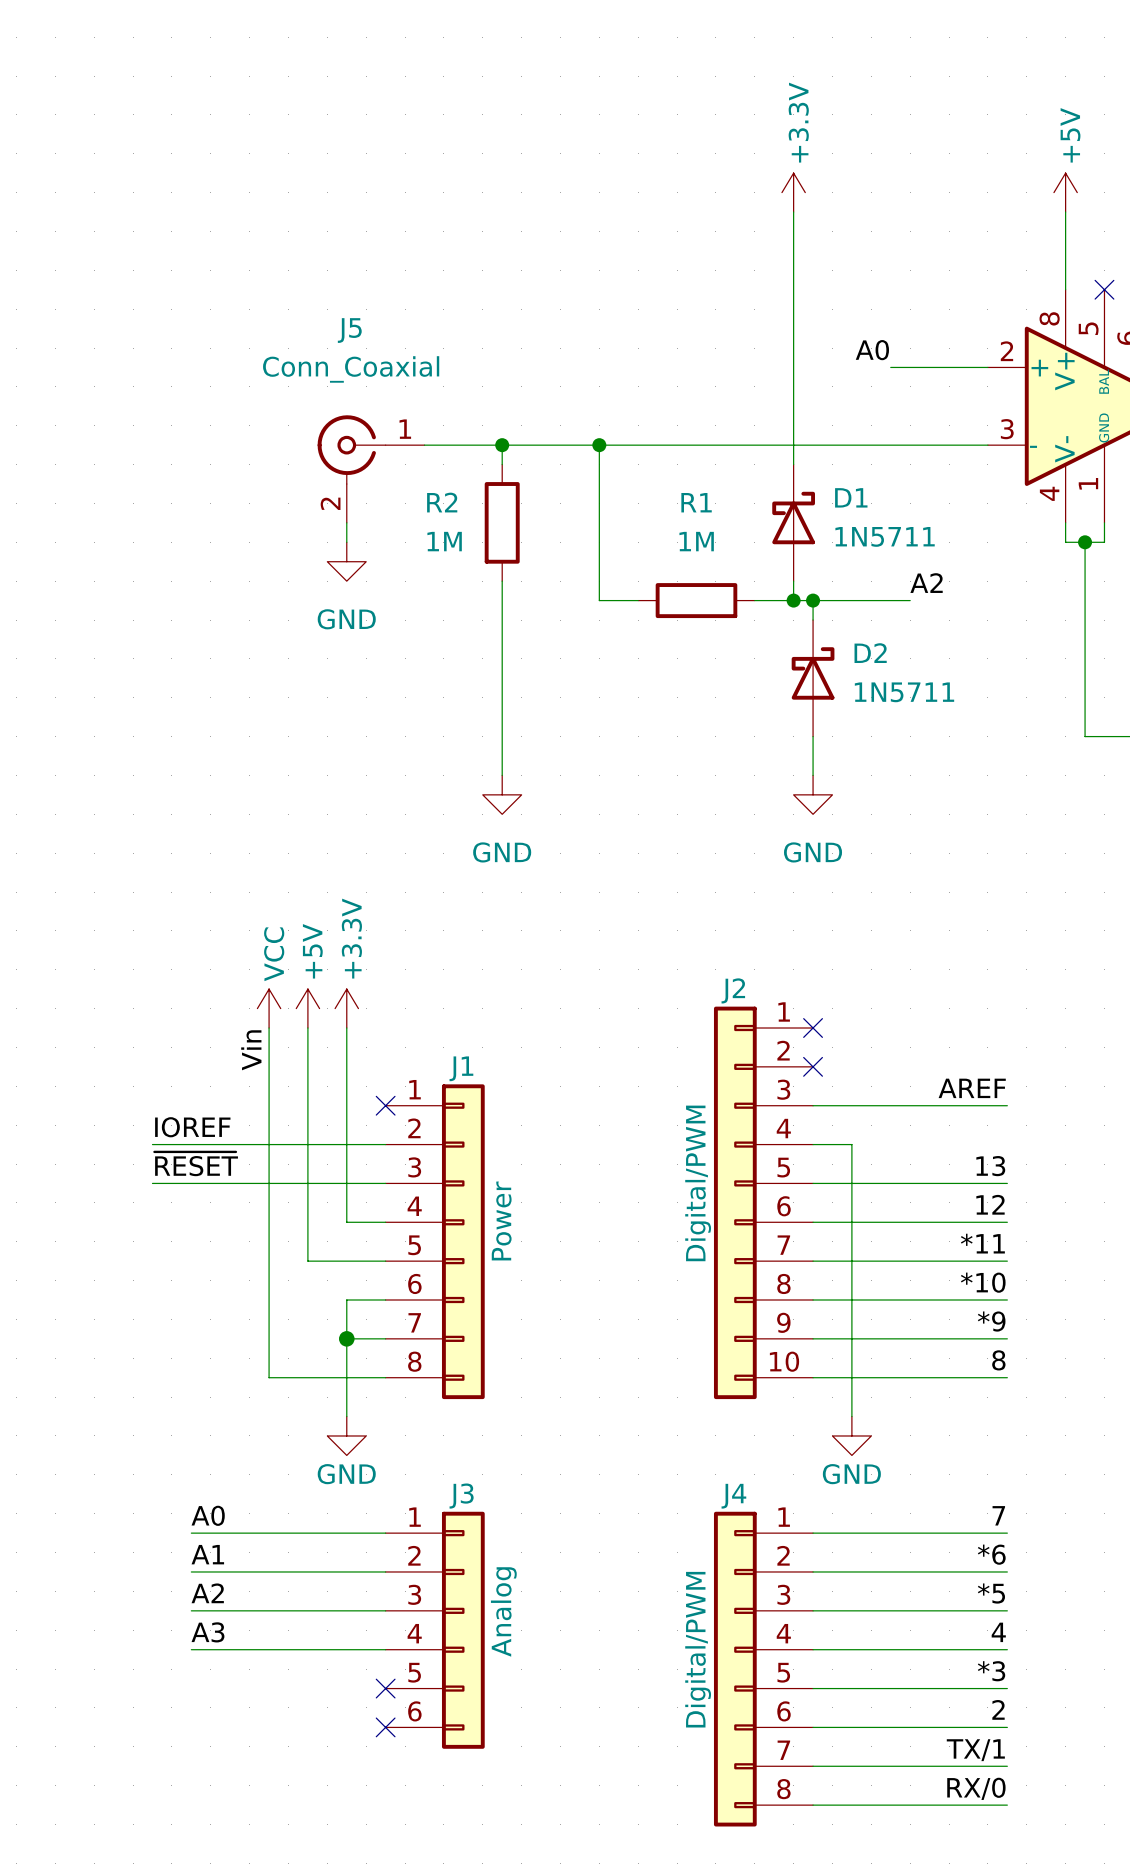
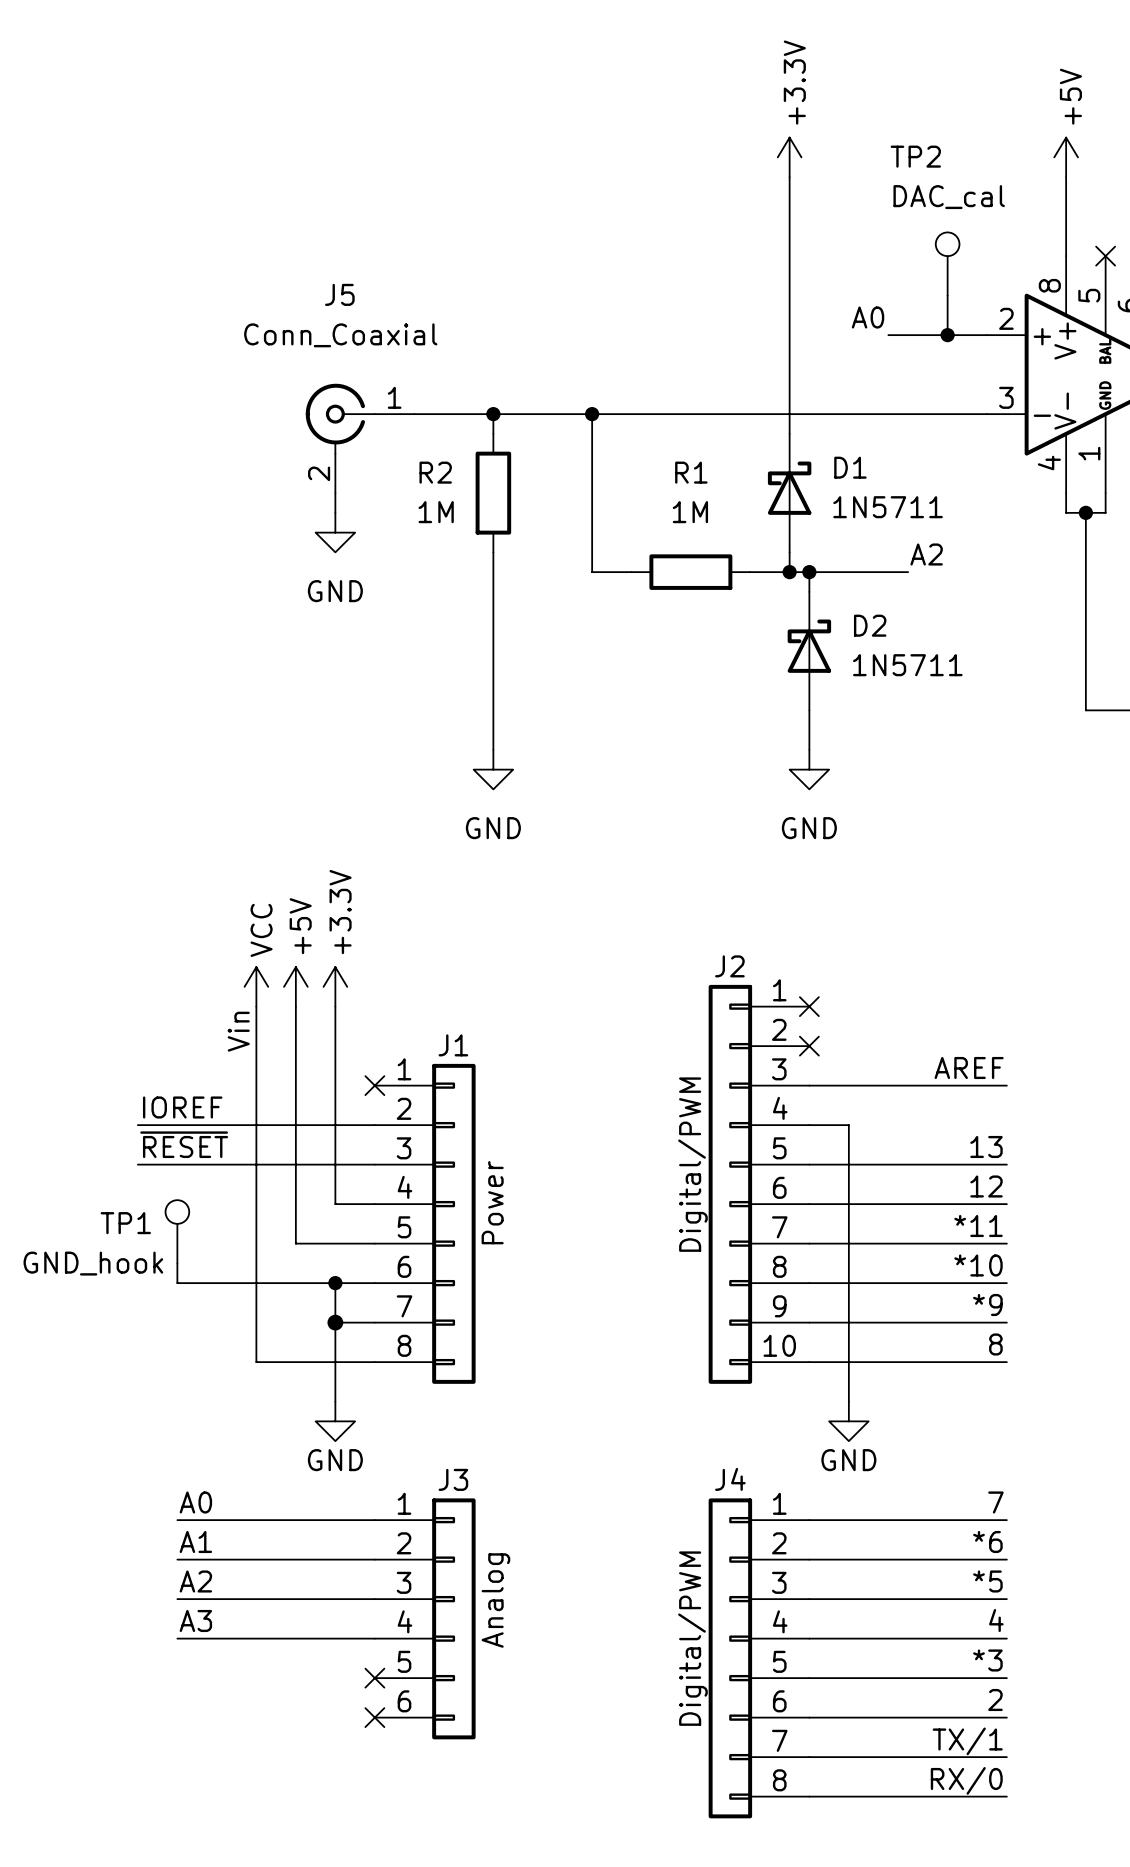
TP2: none -> DAC_cal (947, 264)
wire: none -> (947, 295) (947, 335)
junction: none -> (947, 335)
TP1: none -> GND_hook (177, 1231)
wire: none -> (177, 1263) (177, 1283) (335, 1283)
junction: none -> (335, 1283)

